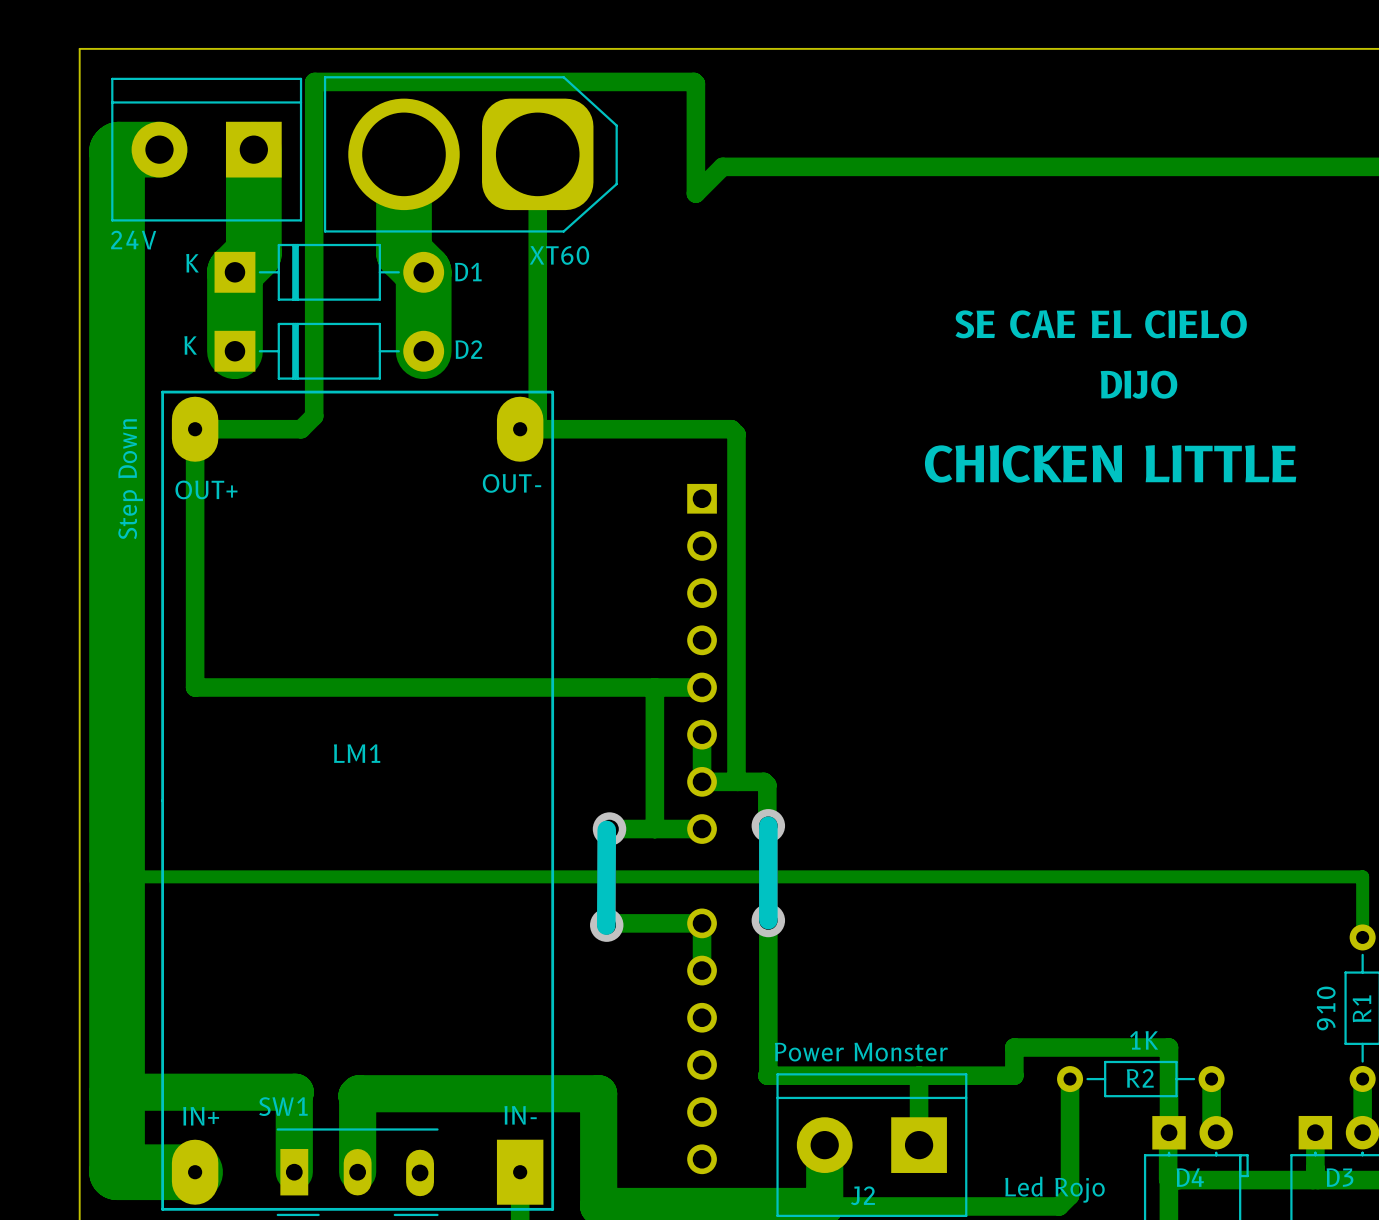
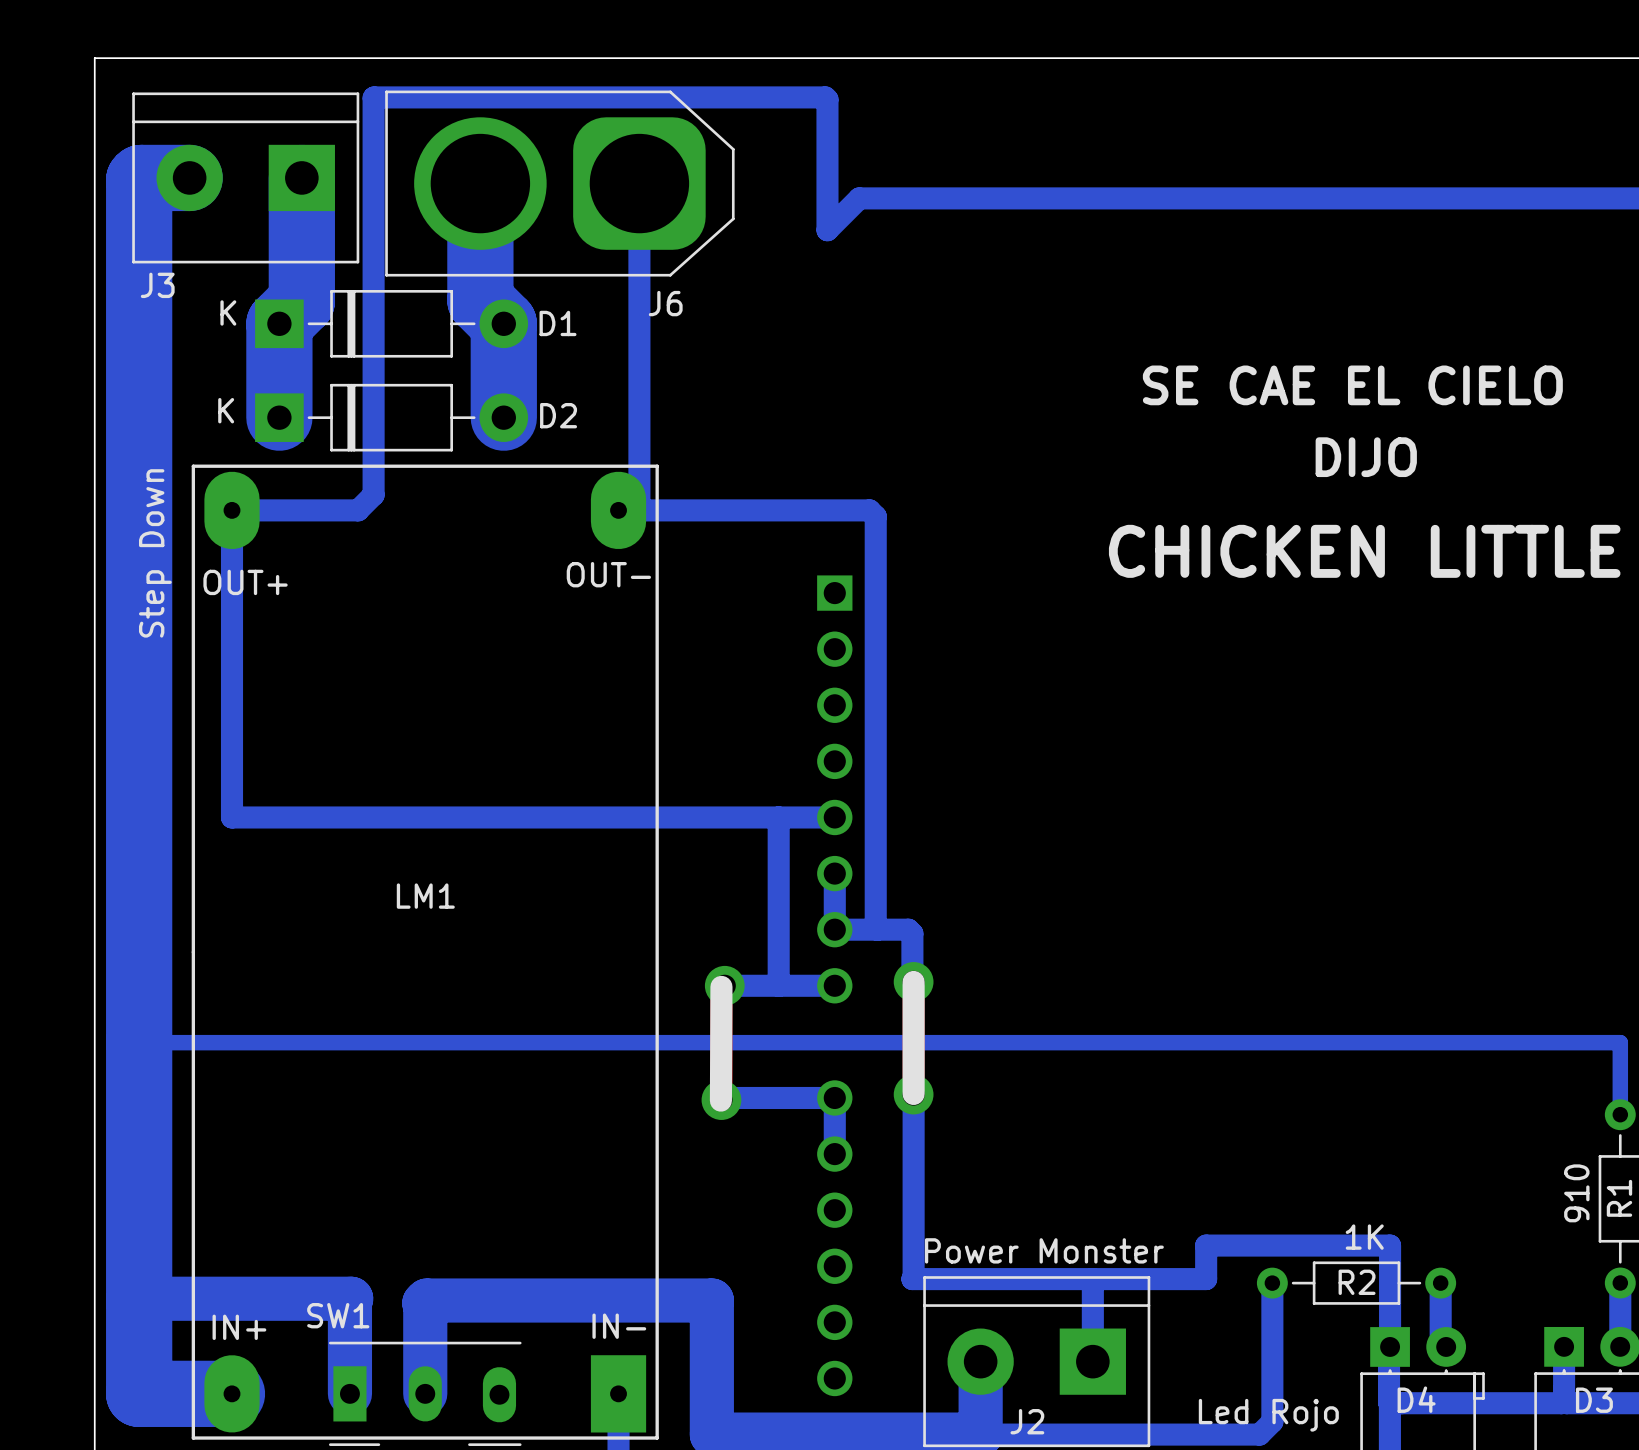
24V name: 24V (133, 240) -> J3 (157, 285)
XT60 name: XT60 (559, 255) -> J6 (665, 303)

